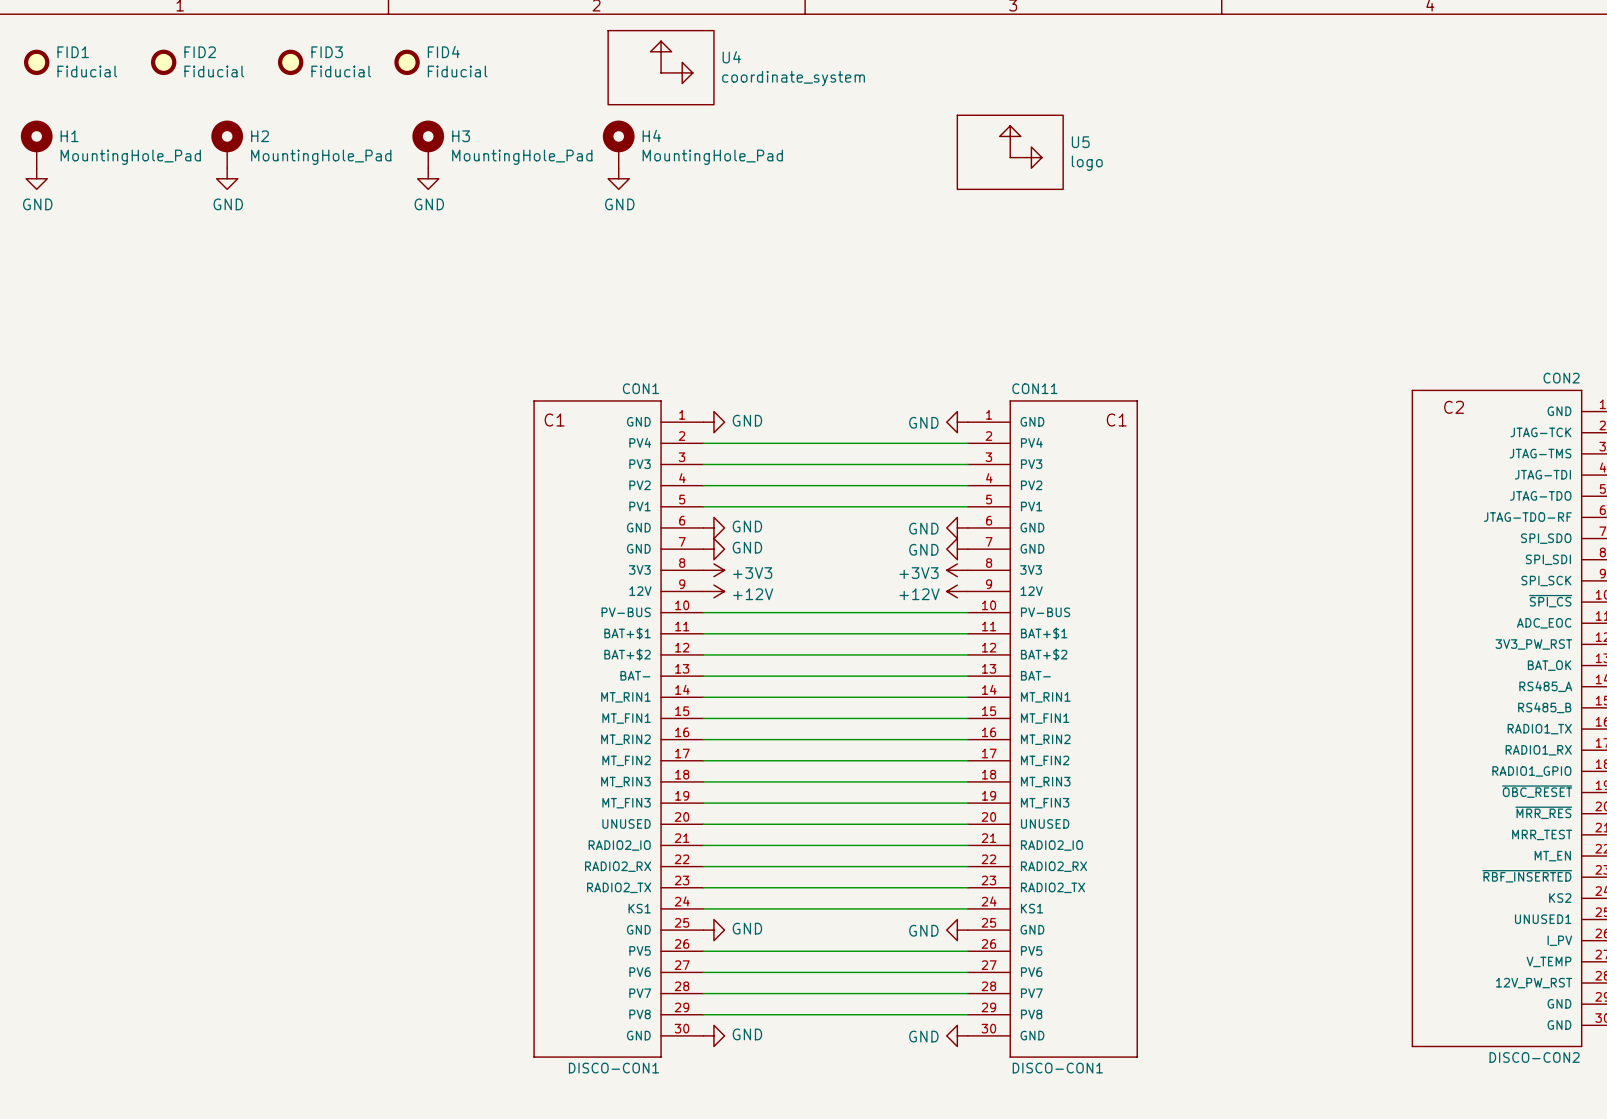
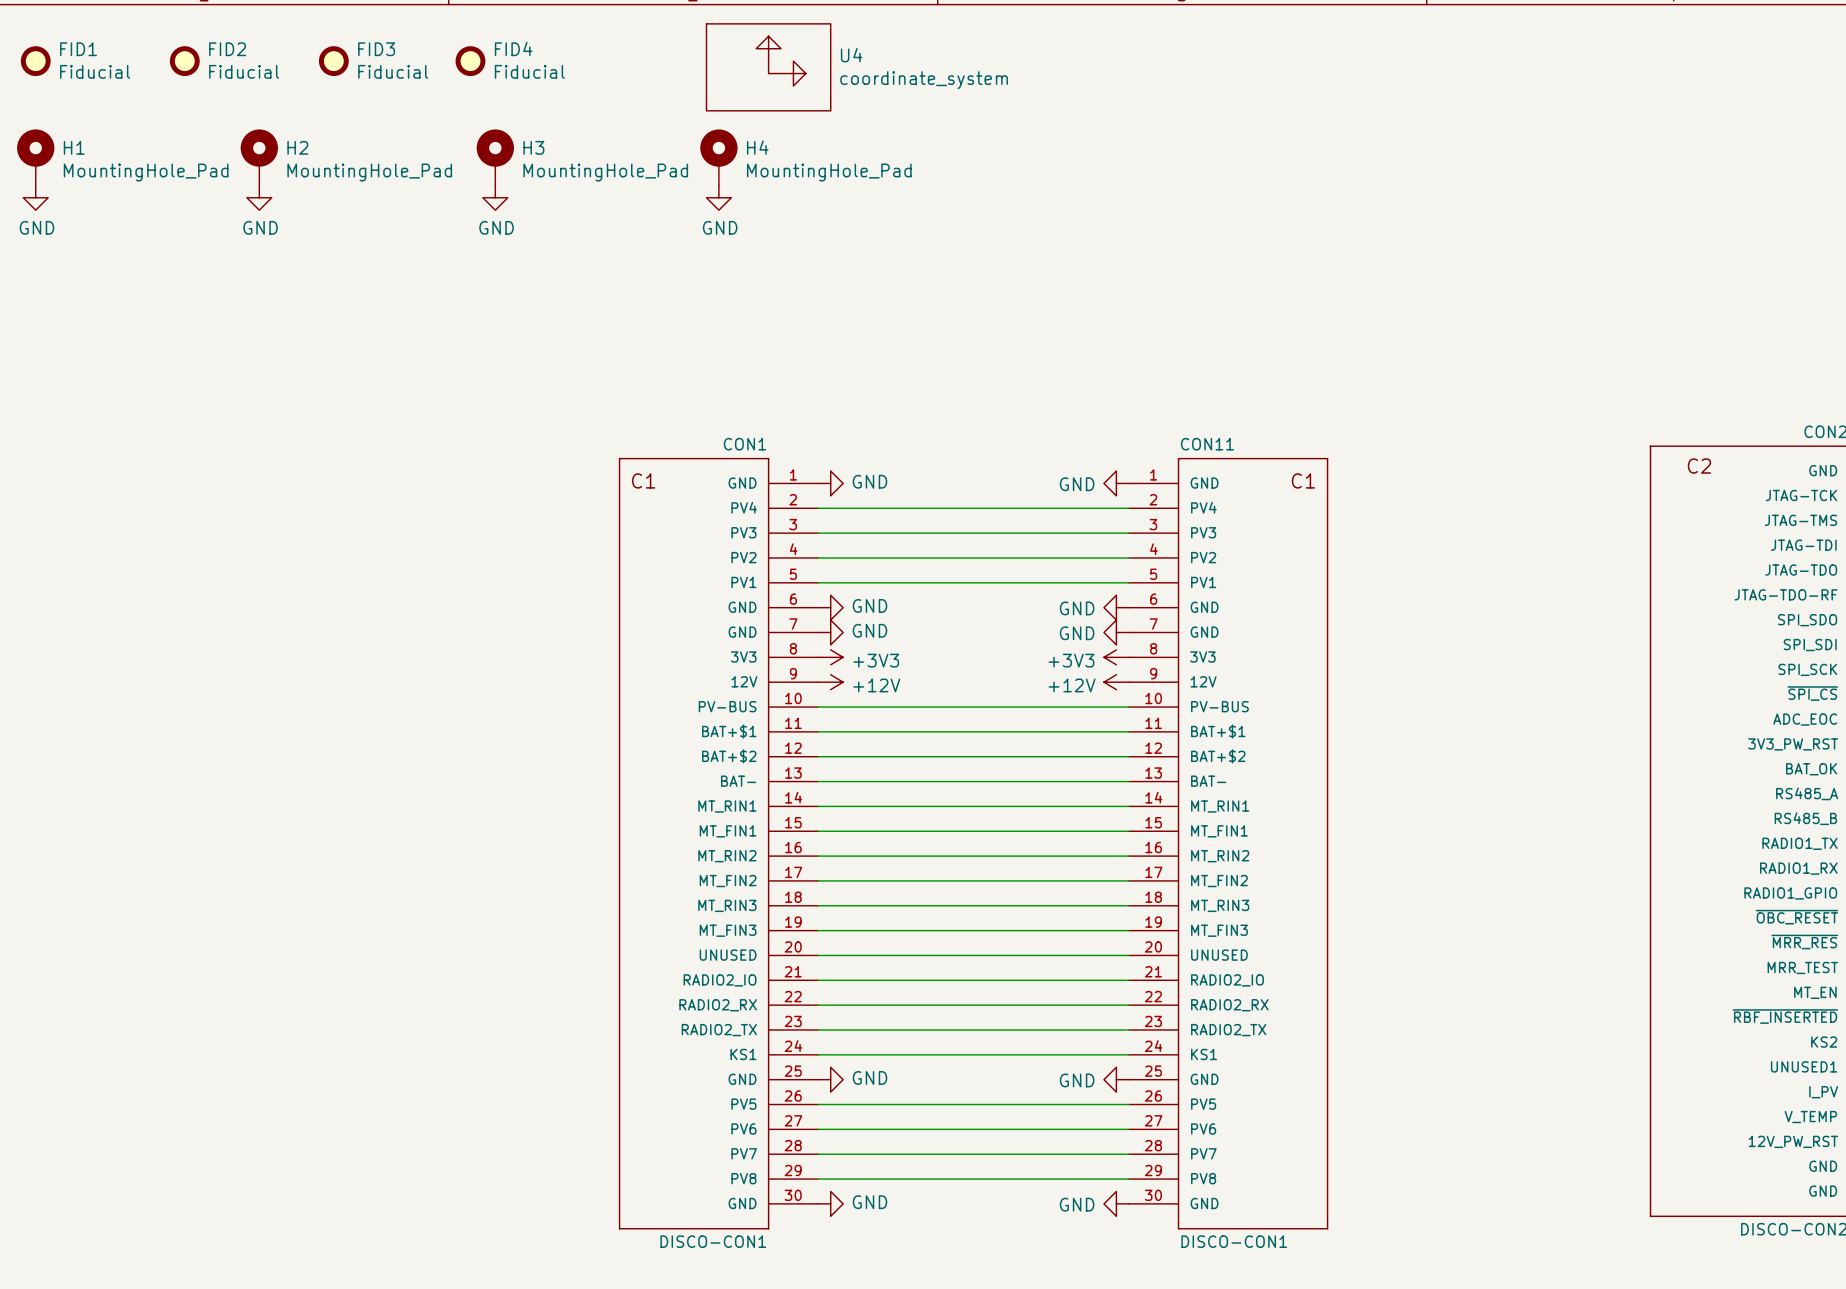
U5: logo (1010, 152) -> none

